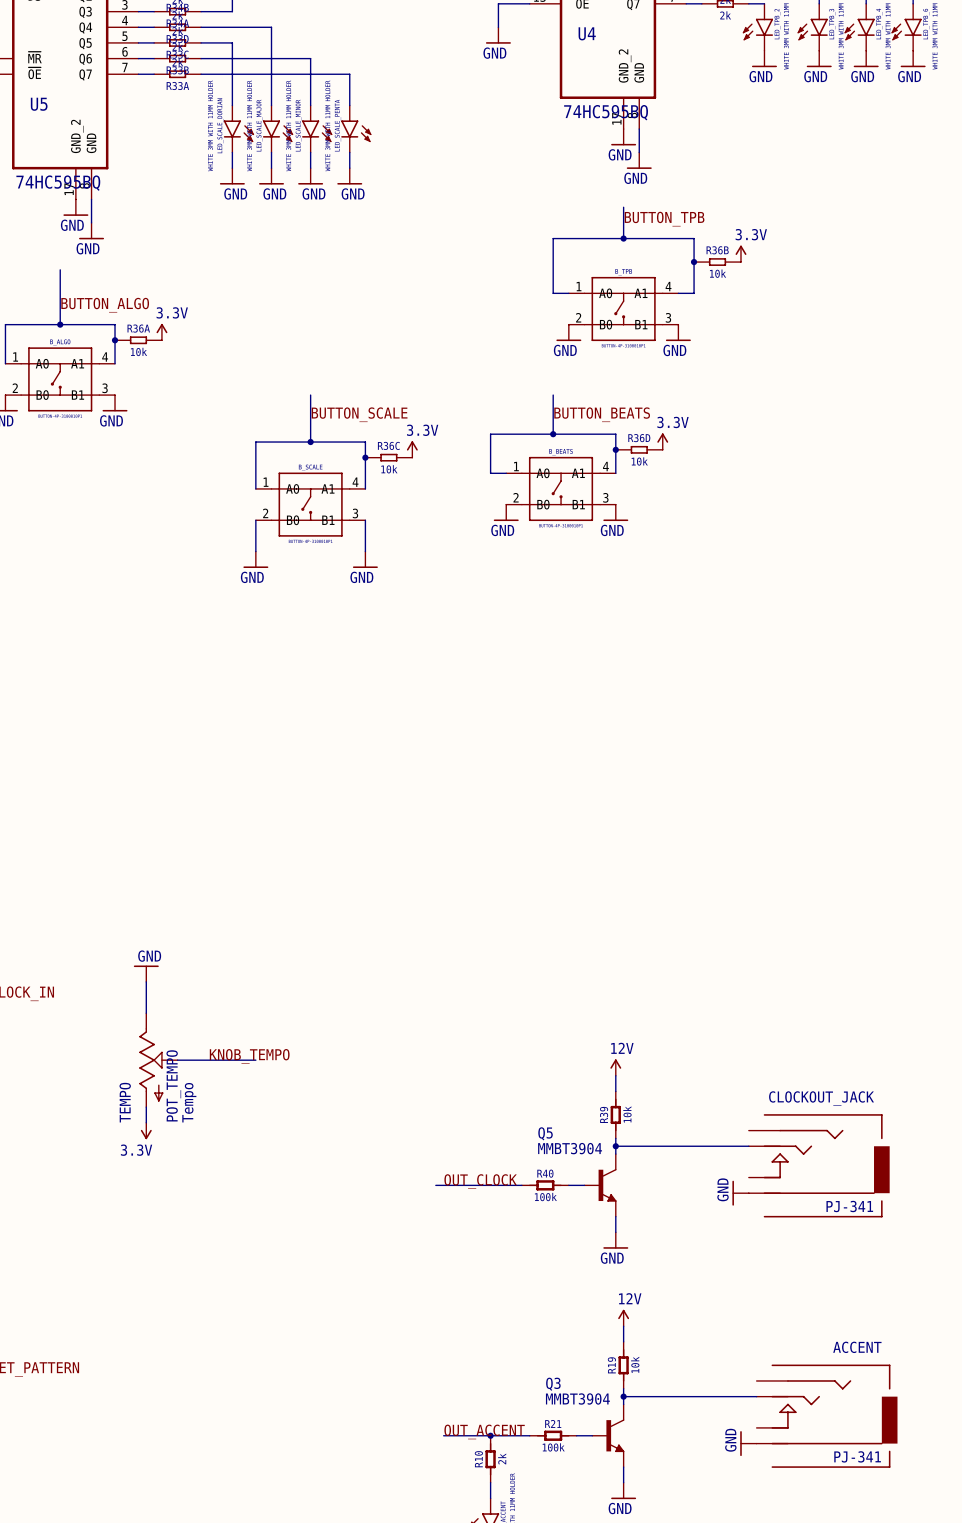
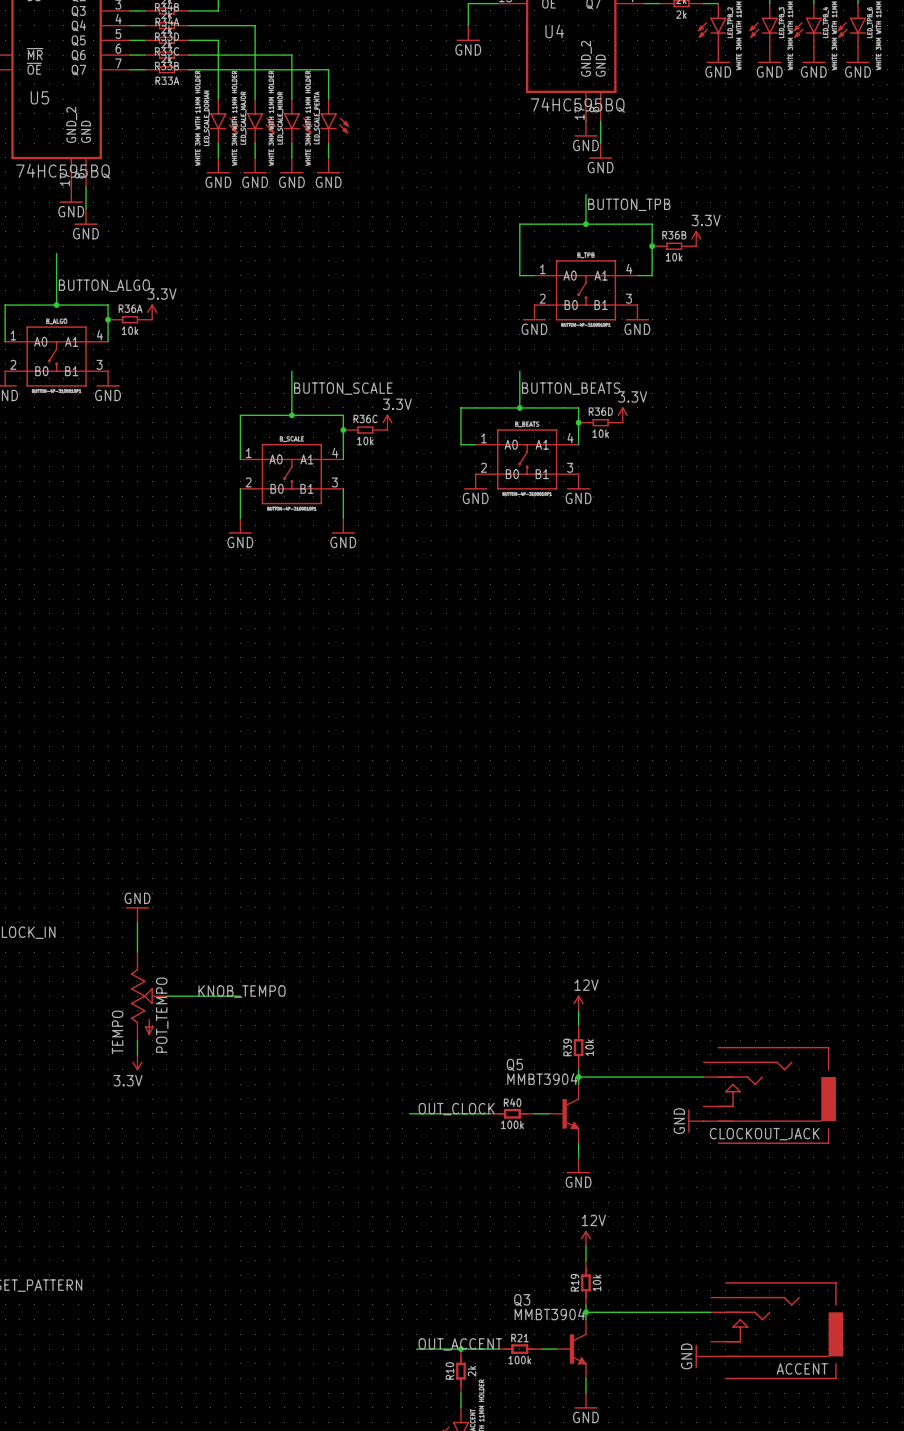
CLOCKOUT_JACK name position: CLOCKOUT_JACK (821, 1098) -> CLOCKOUT_JACK (764, 1134)
POT_TEMPO text: Tempo (189, 1102) -> none
CLOCKOUT_JACK value: PJ-341 (849, 1206) -> none
ACCENT name position: ACCENT (857, 1347) -> ACCENT (802, 1368)
ACCENT value: PJ-341 (857, 1456) -> none

